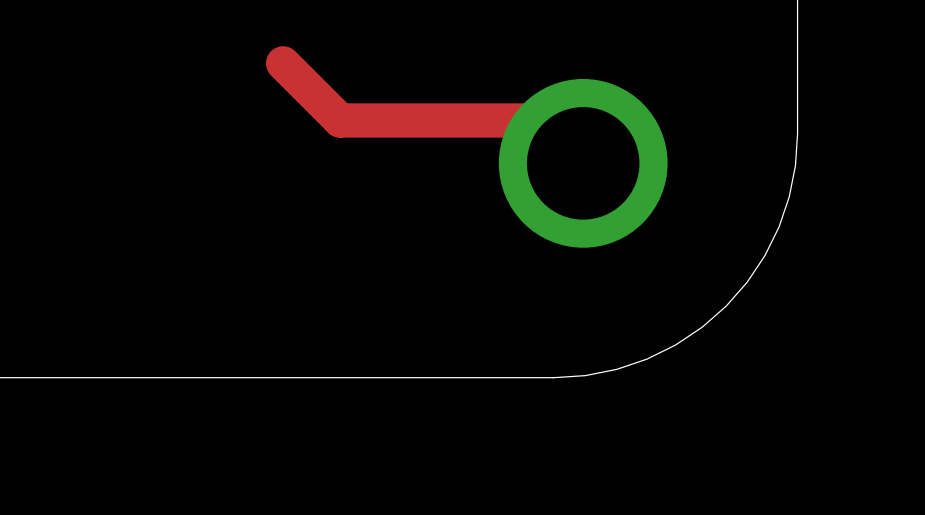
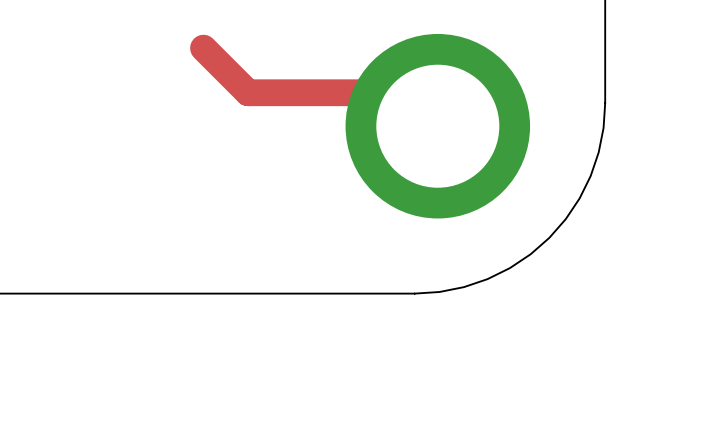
via size: [498, 78, 668, 248] -> [345, 33, 531, 219]

